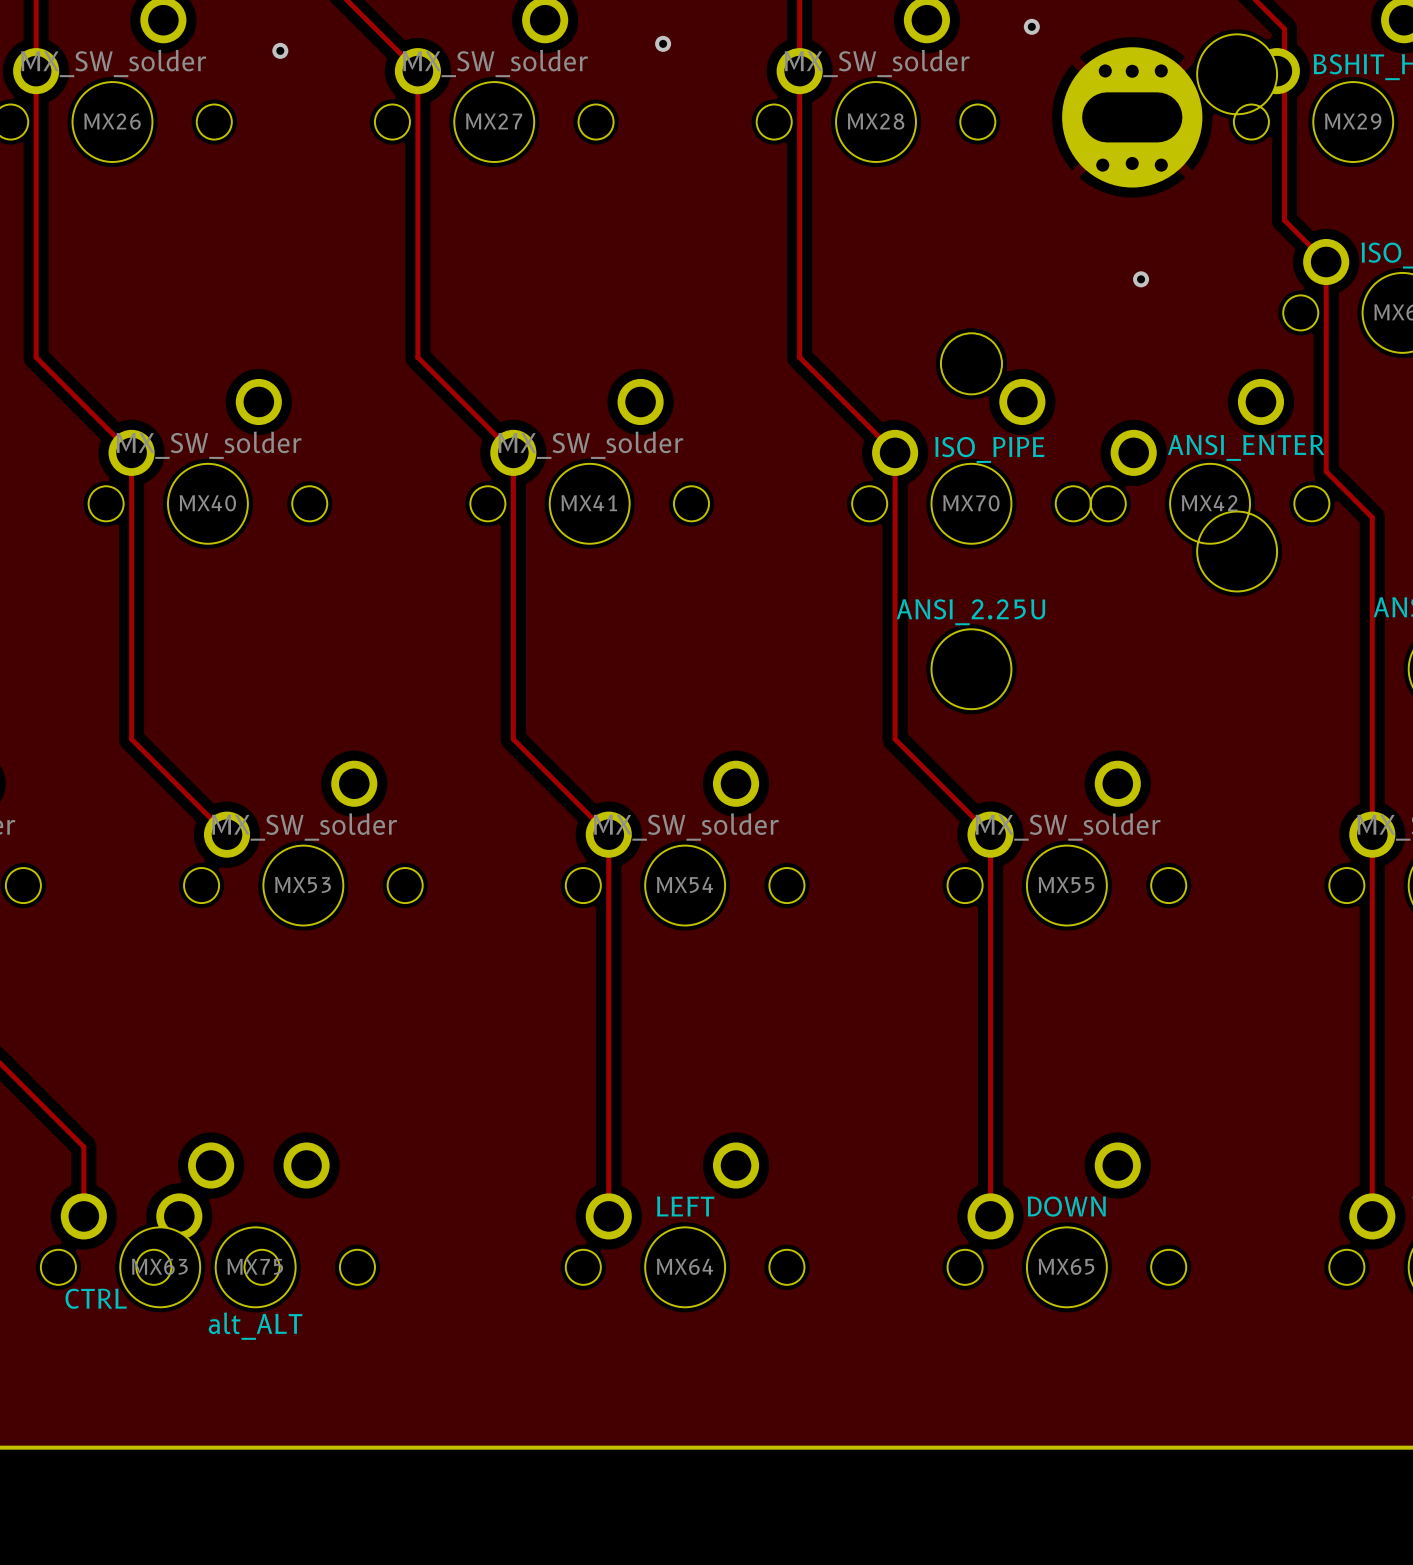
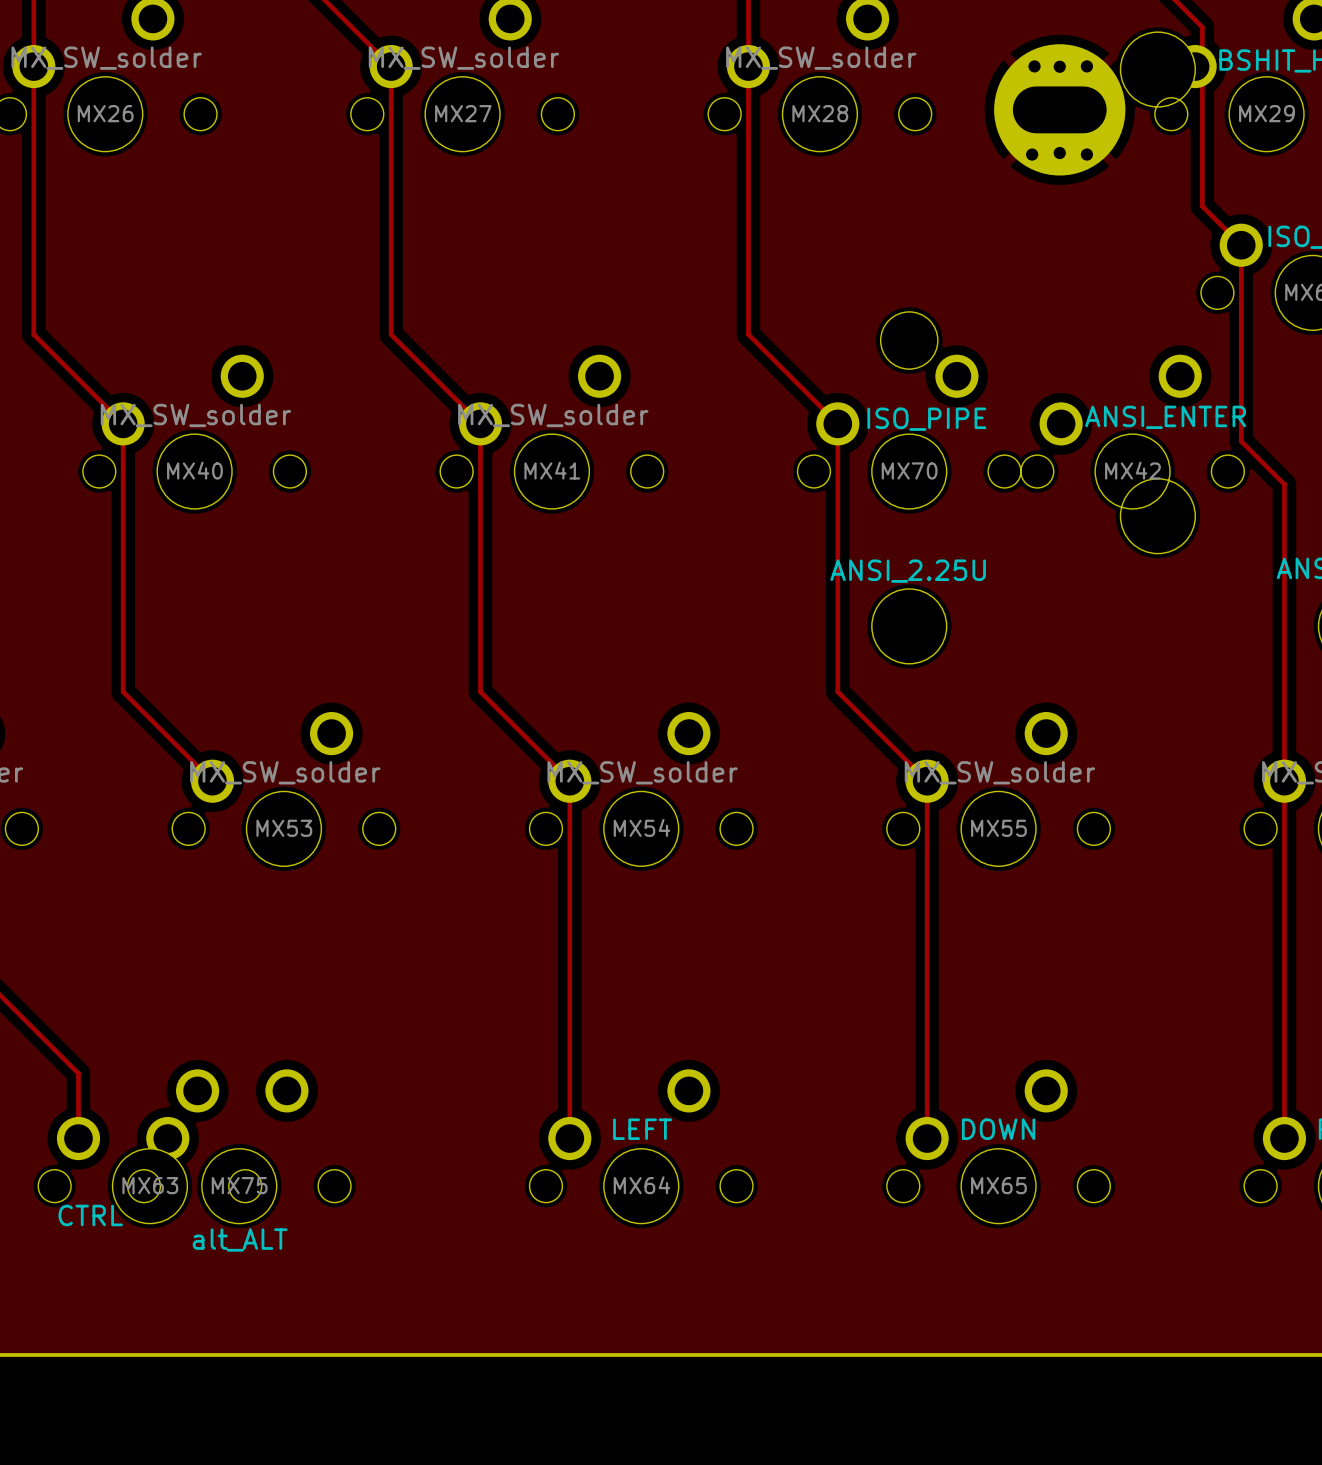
via: (1031, 26) -> none
via: (663, 43) -> none
via: (280, 50) -> none
via: (1141, 279) -> none

